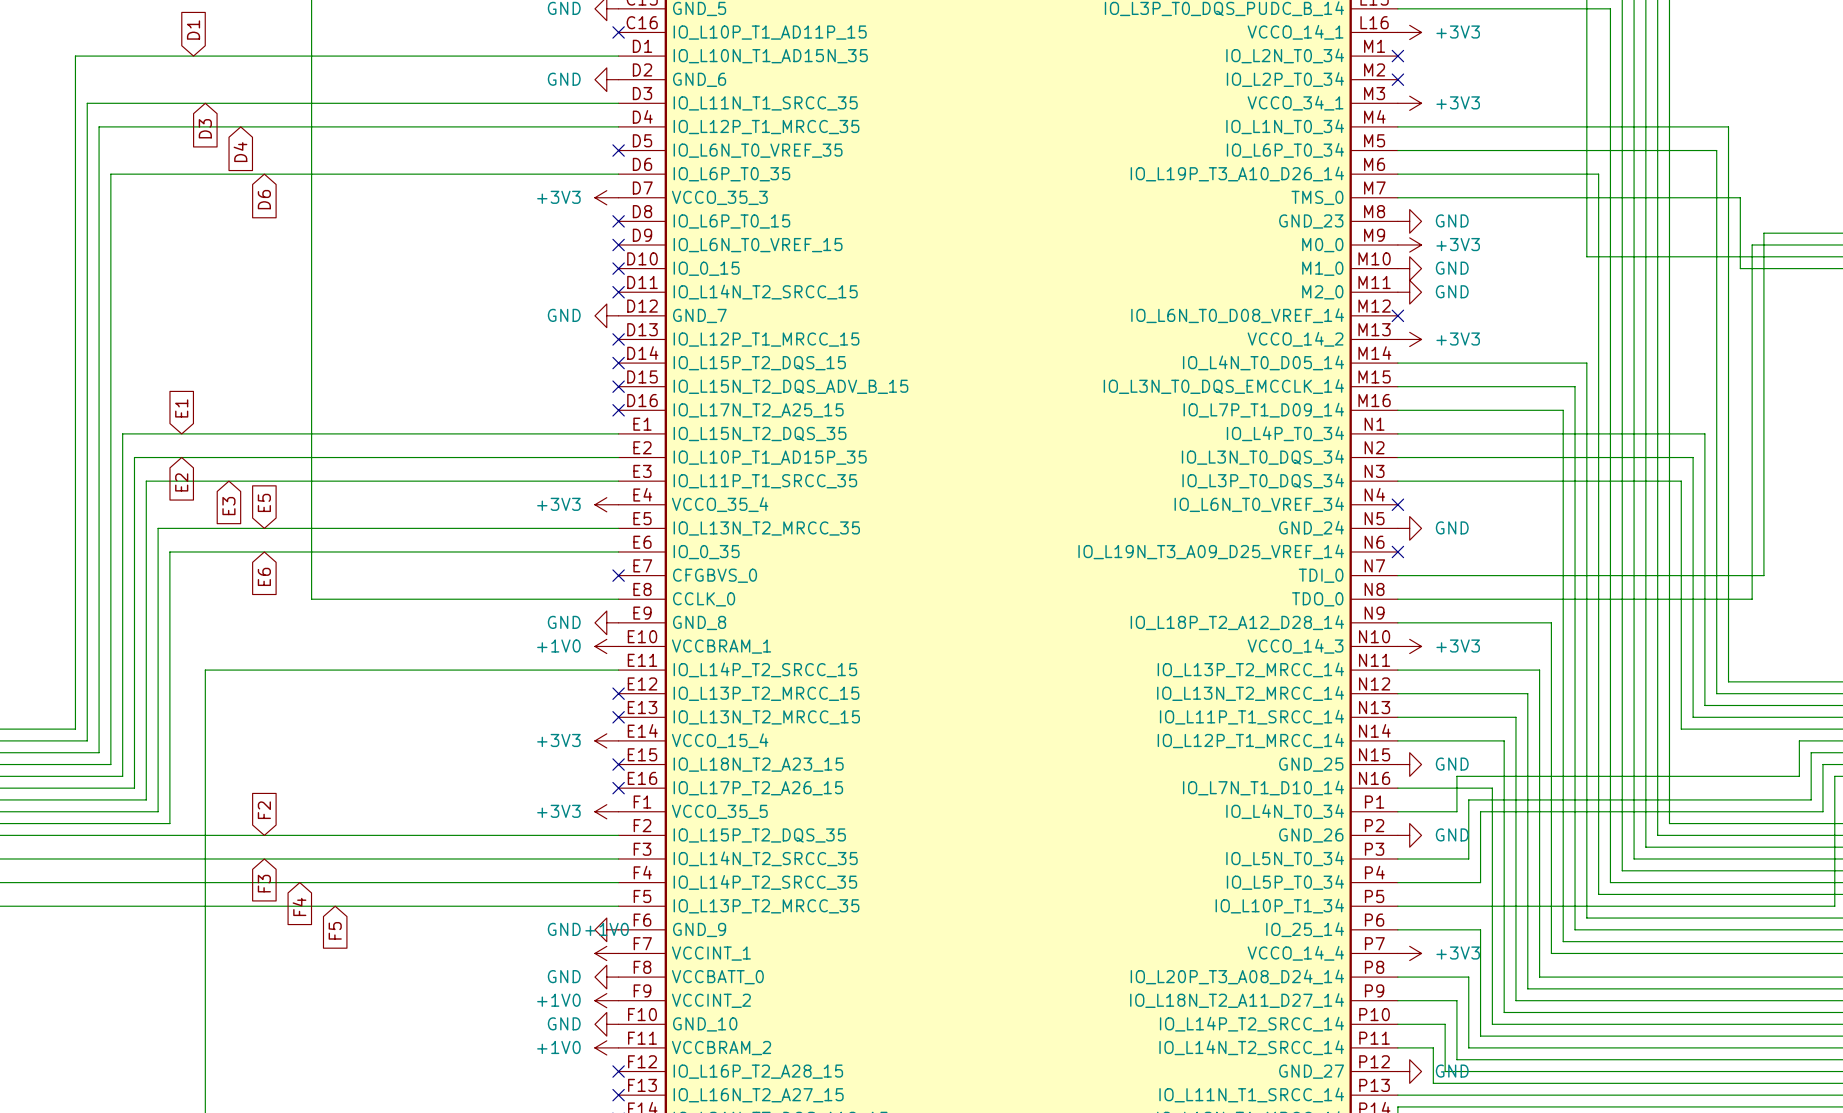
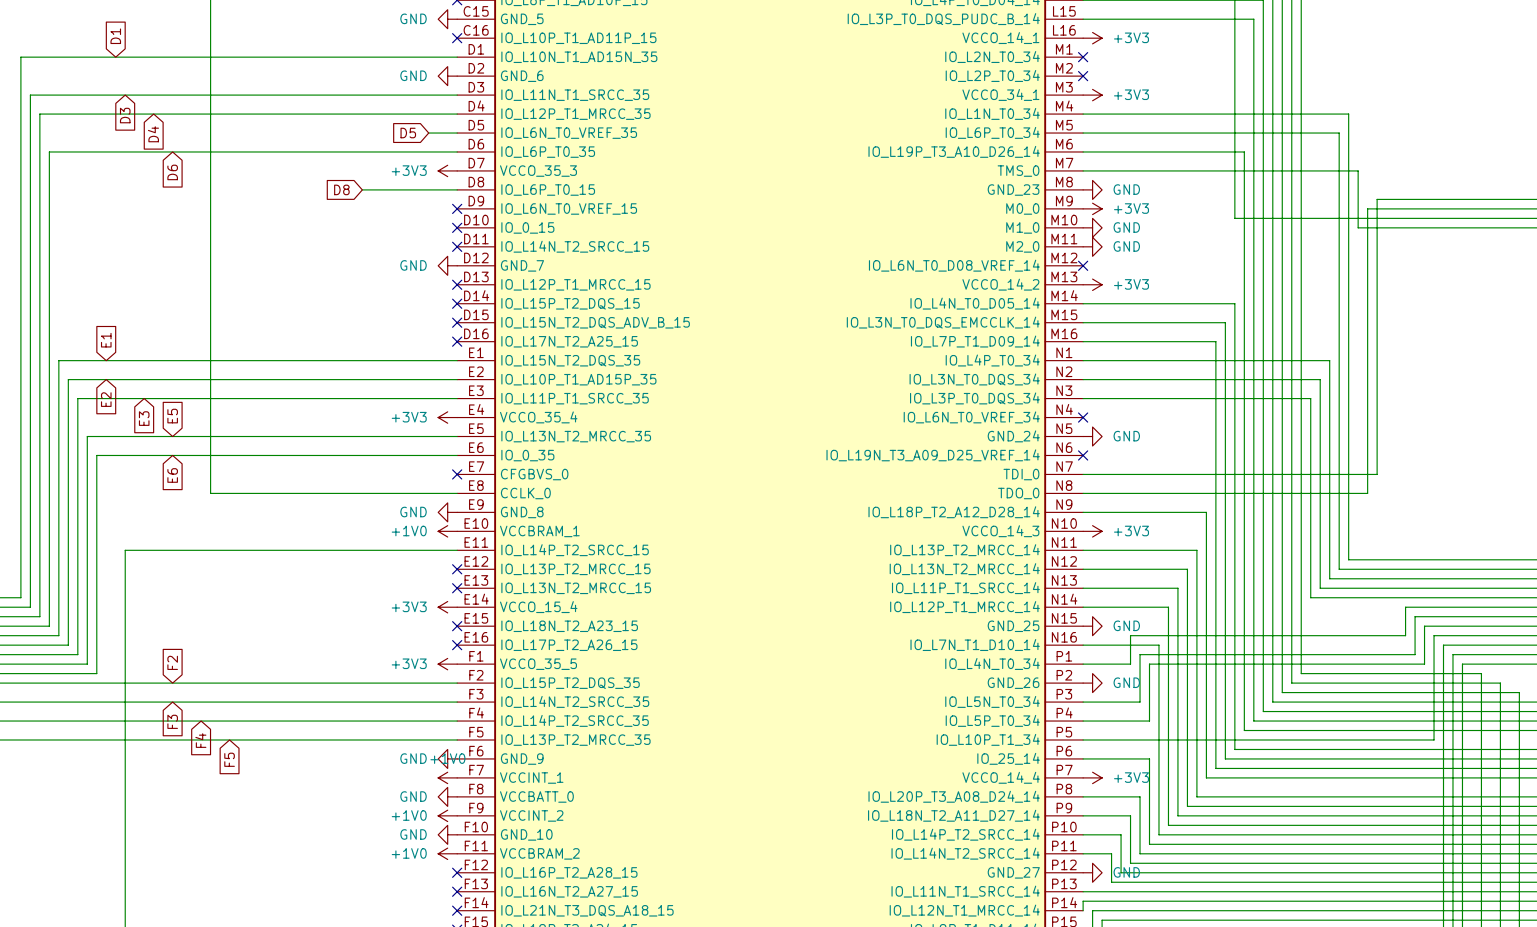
global label: none -> D5 (408, 133)
wire: none -> (428, 133) (457, 133)
no-connect mark: (618, 150) -> none
global label: none -> D8 (341, 189)
wire: none -> (362, 189) (457, 189)
no-connect mark: (618, 221) -> none

